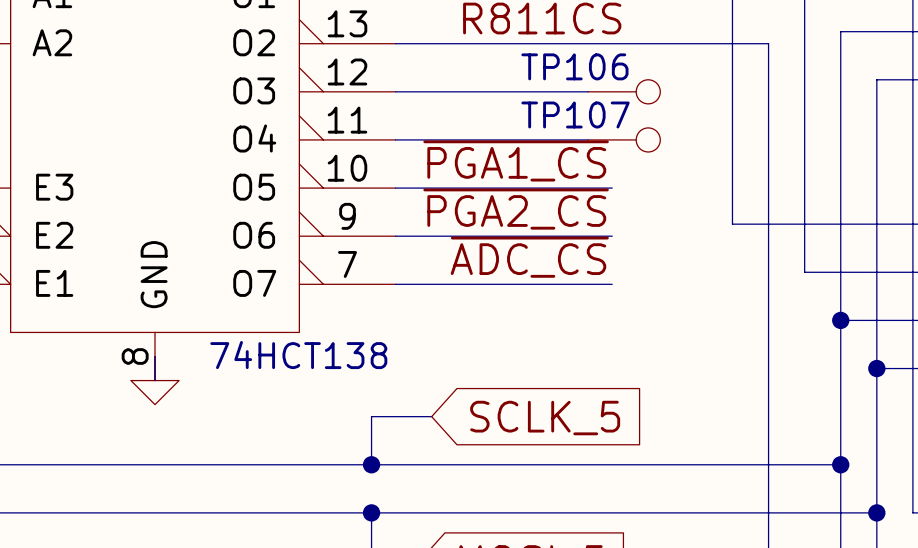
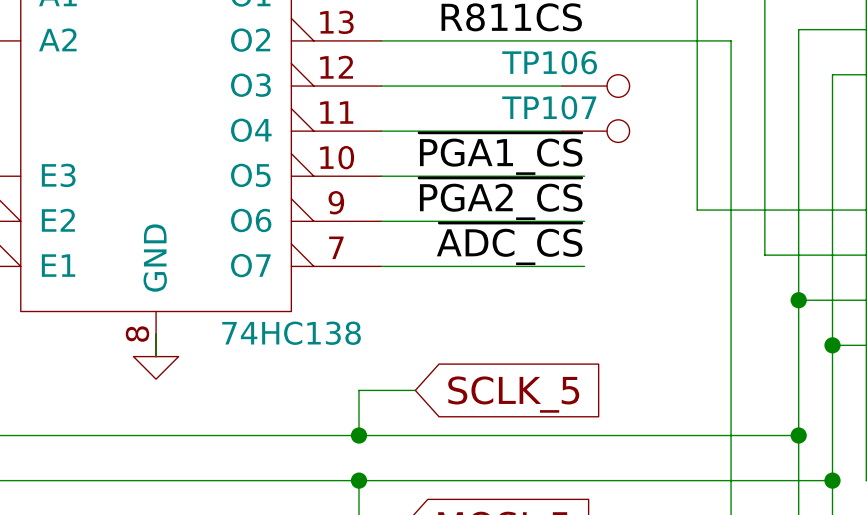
part value: 74HCT138 (298, 355) -> 74HC138 (291, 333)

